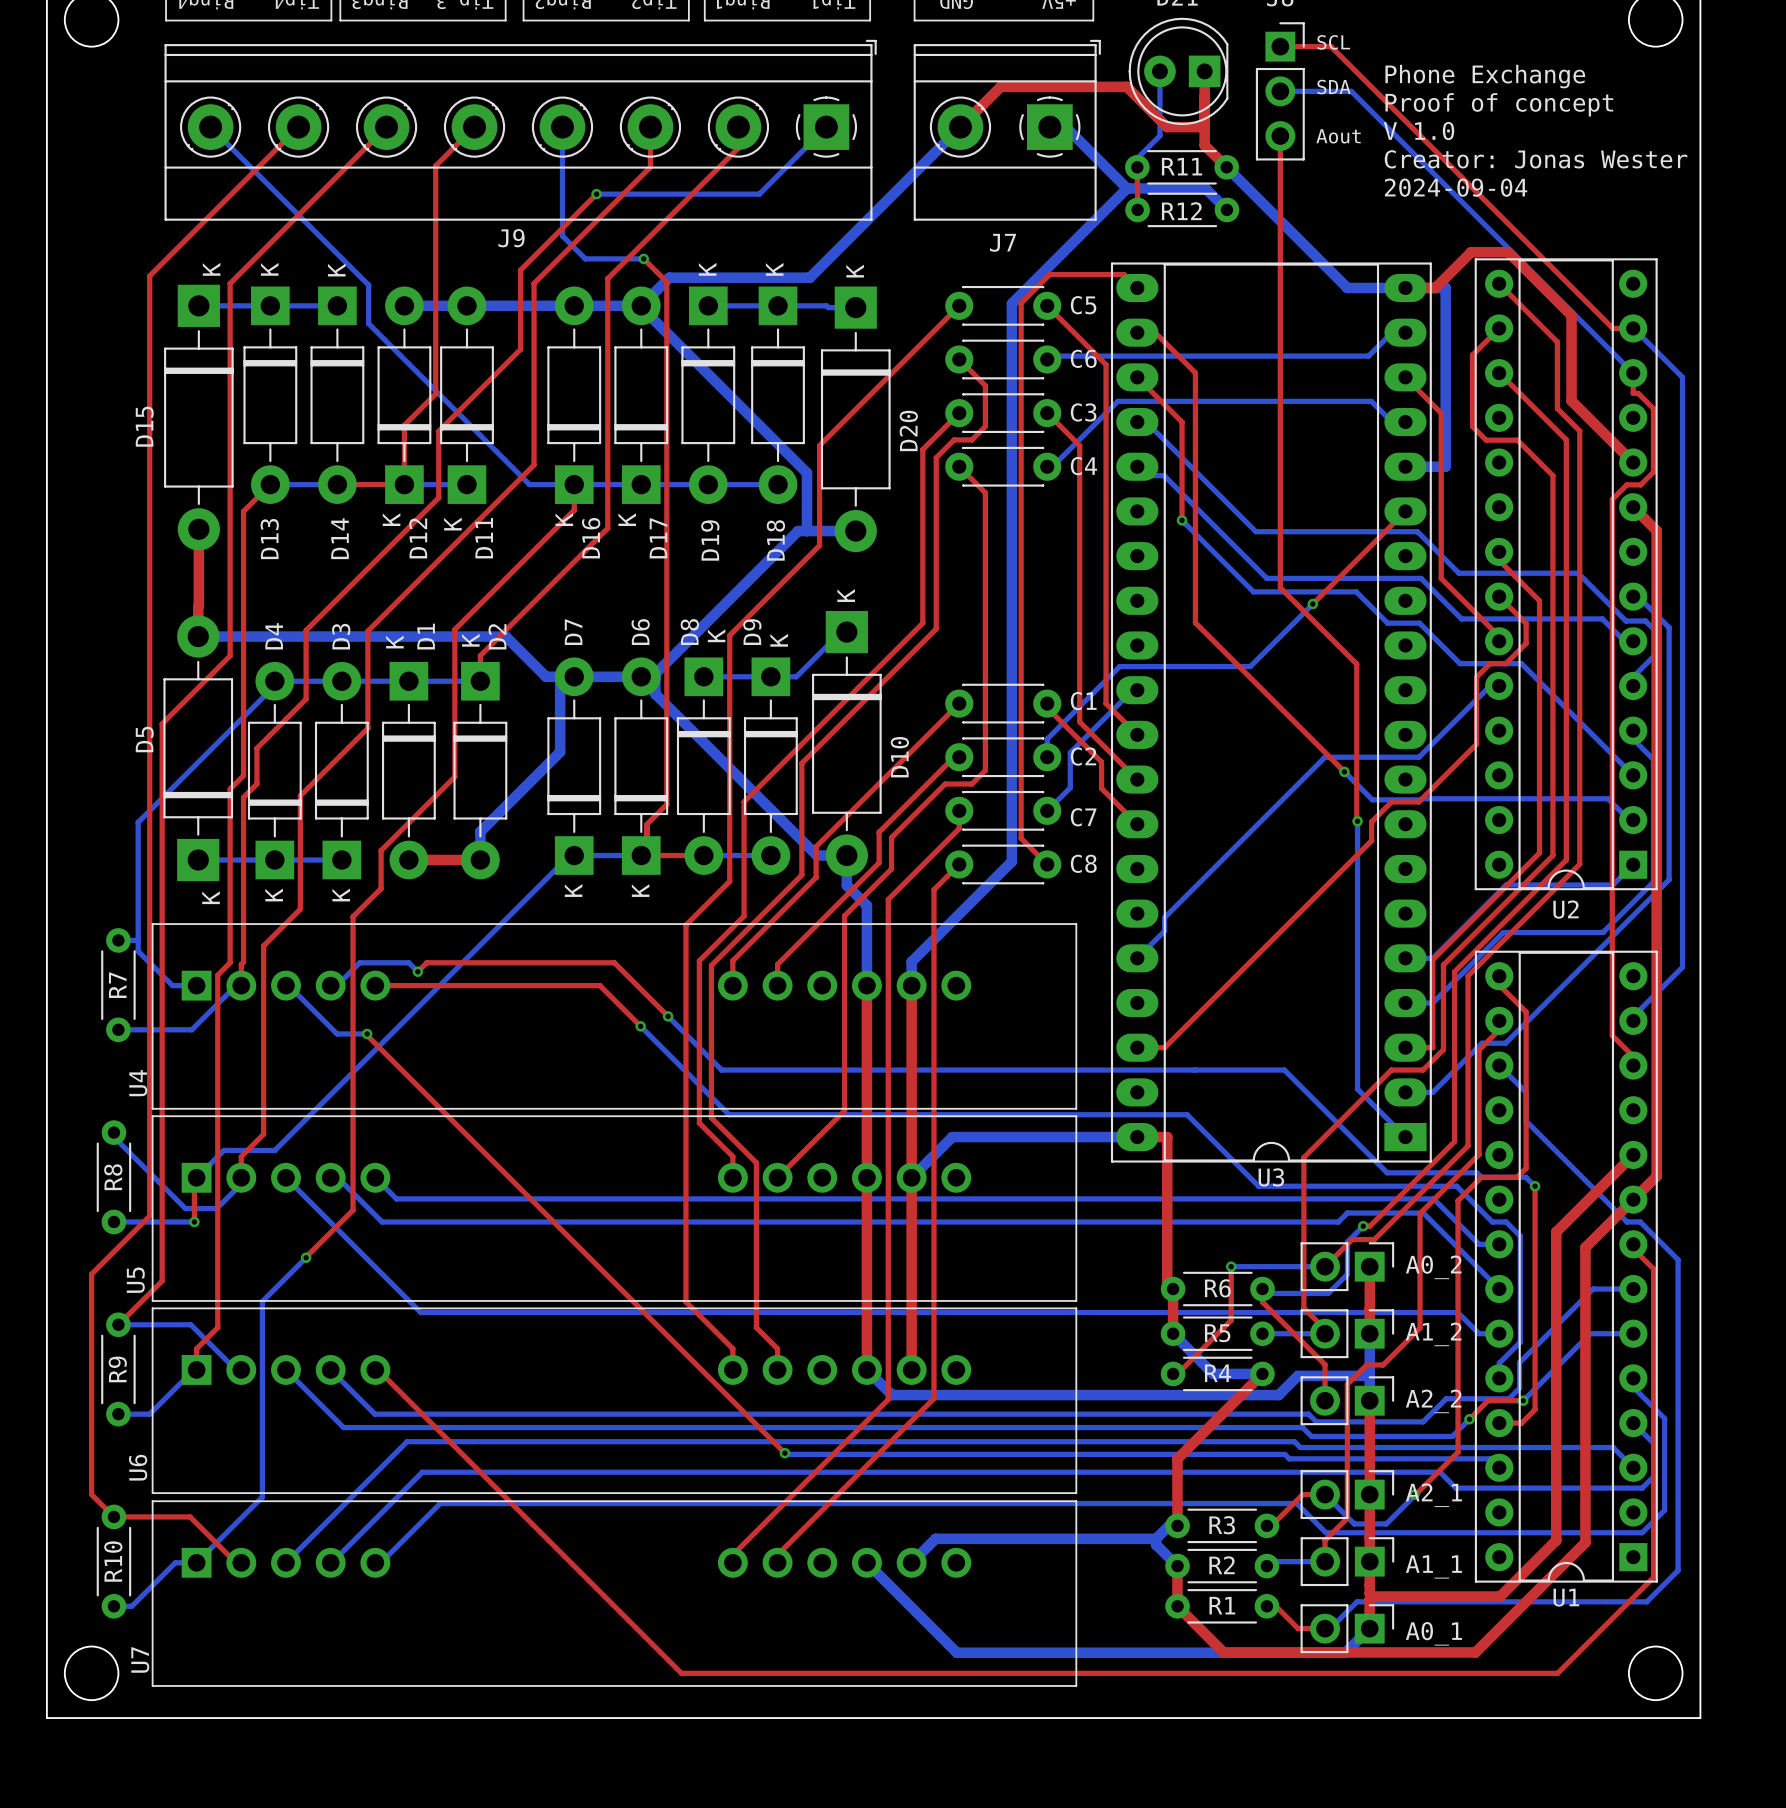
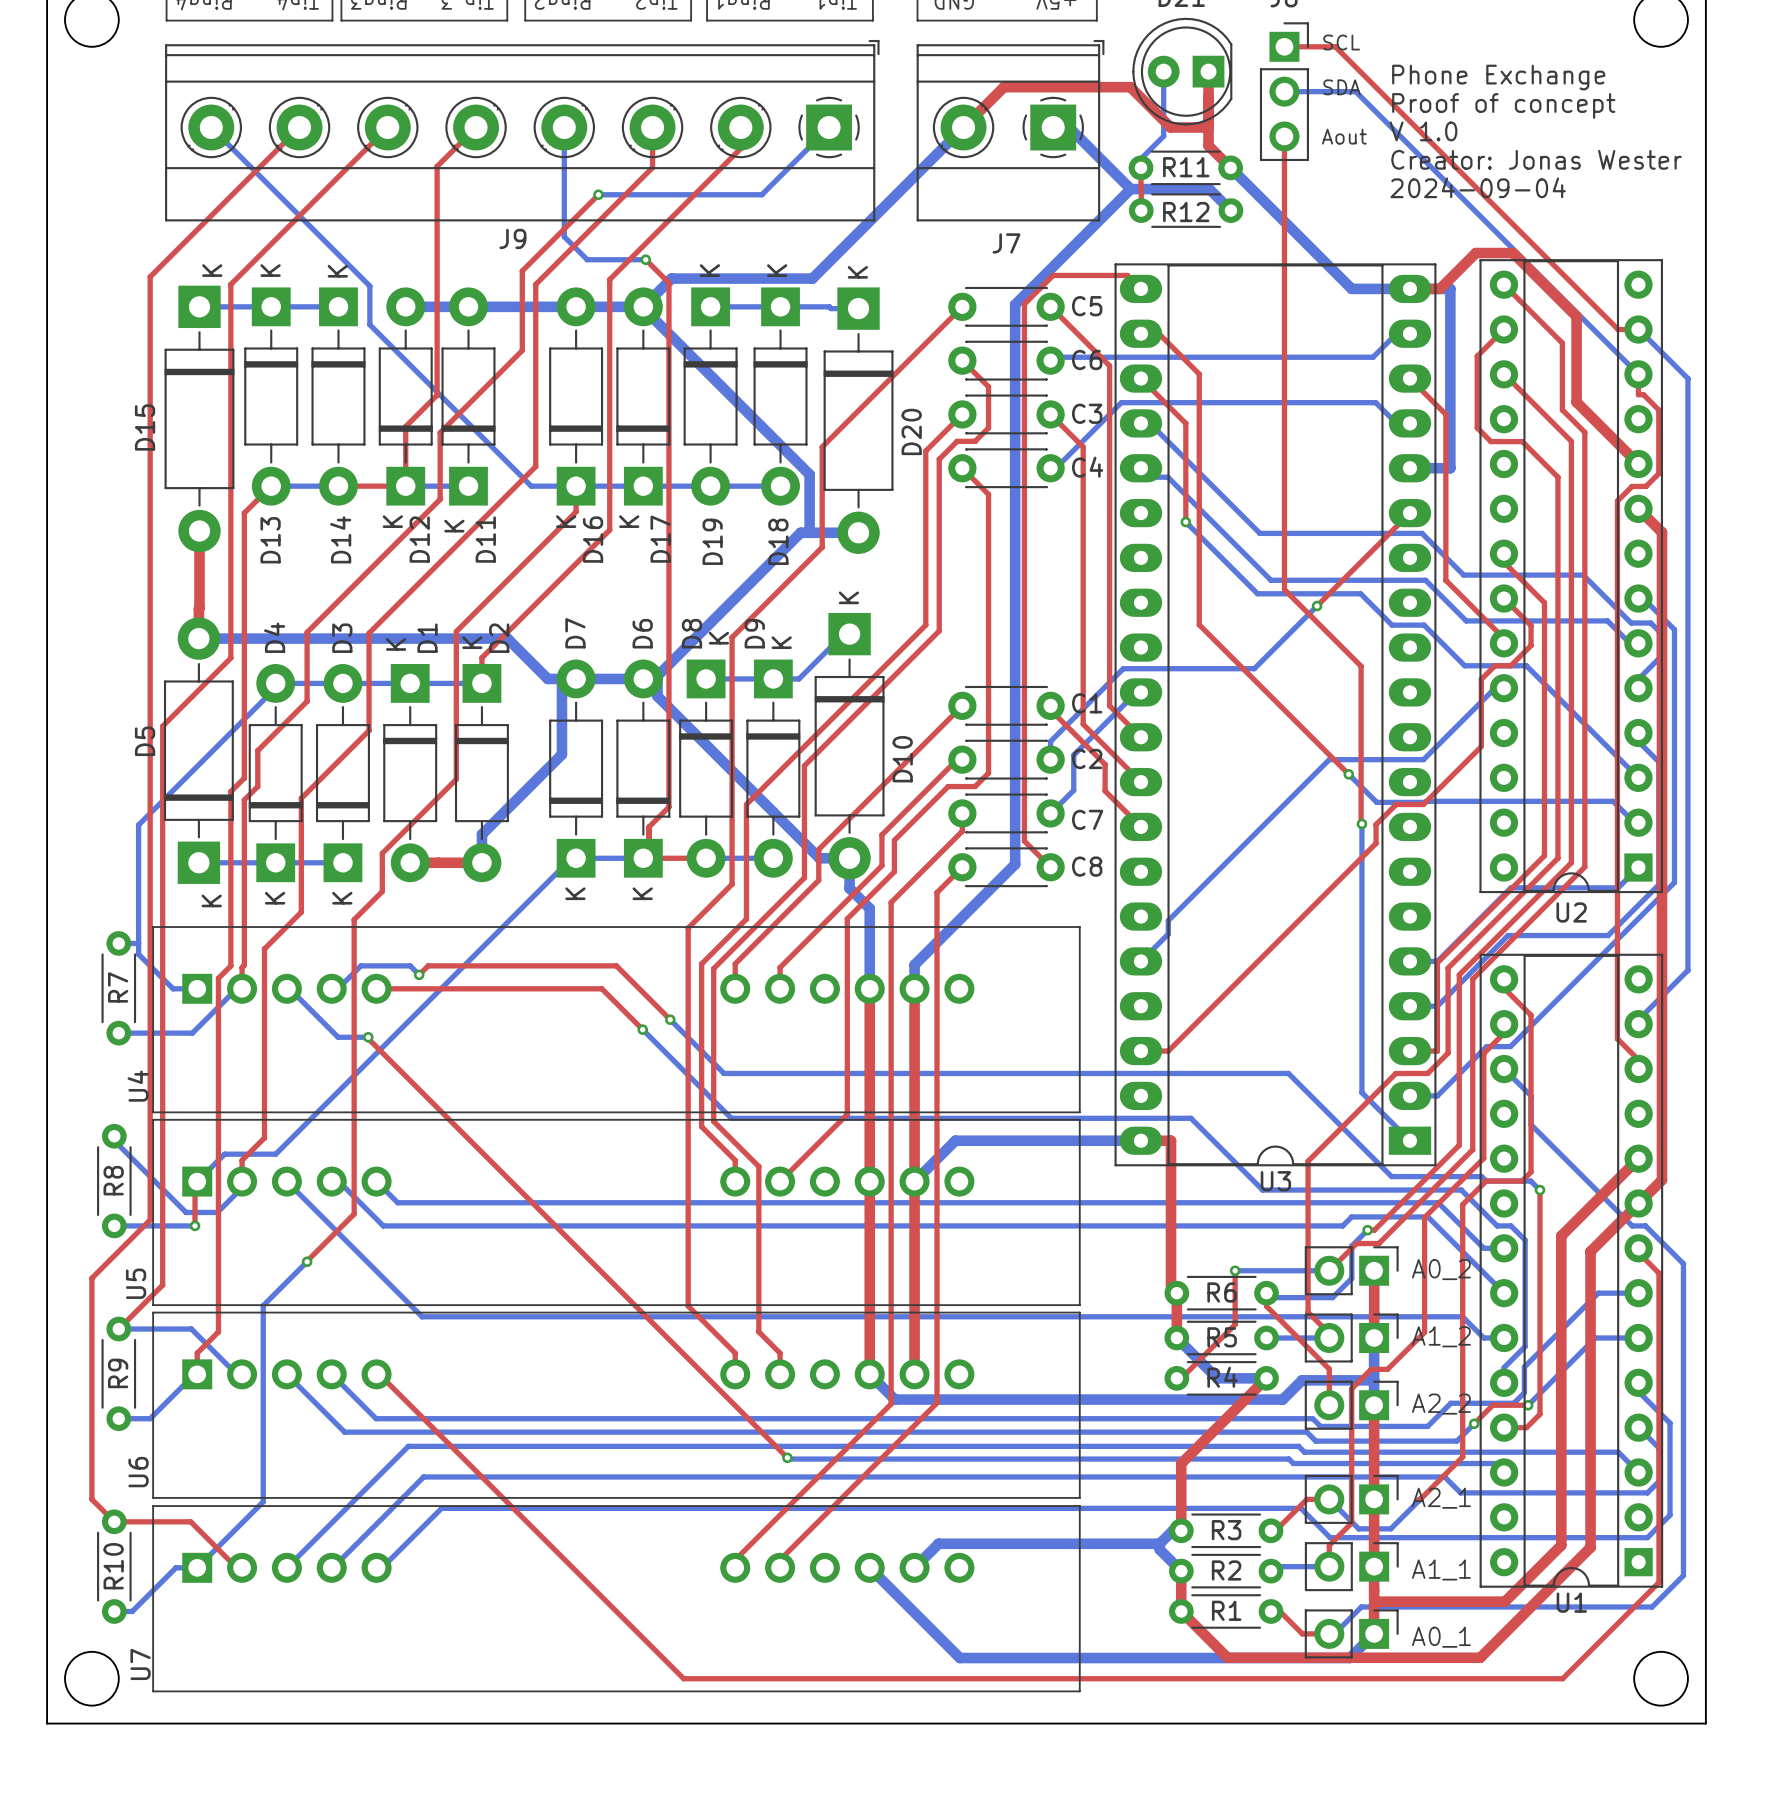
via: (1414, 1494) -> none

